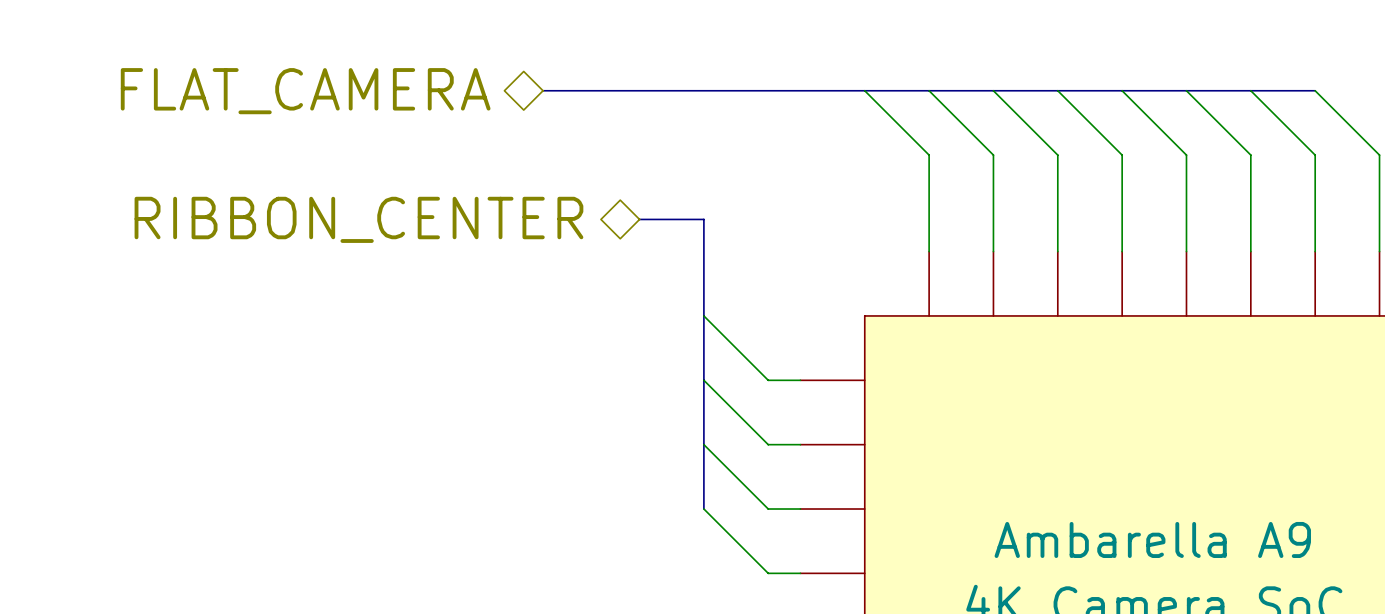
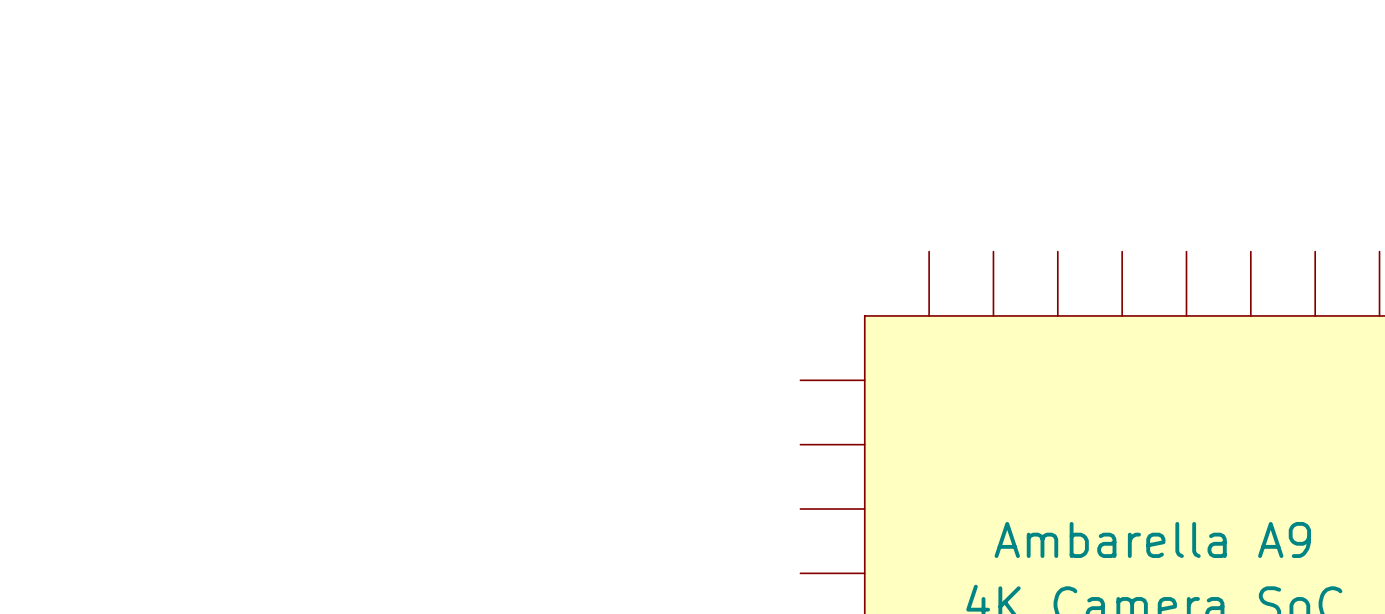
bus: (543, 90) (1315, 90) -> none
wire: (864, 90) (929, 155) (929, 251) -> none
wire: (929, 90) (993, 155) (993, 251) -> none
wire: (993, 90) (1057, 155) (1057, 251) -> none
wire: (1057, 90) (1122, 155) (1122, 251) -> none
wire: (1122, 90) (1186, 155) (1186, 251) -> none
wire: (1186, 90) (1250, 155) (1250, 251) -> none
wire: (1250, 90) (1315, 155) (1315, 251) -> none
wire: (1315, 90) (1379, 155) (1379, 251) -> none
hierarchical label: FLAT_CAMERA (305, 91) -> none
hierarchical label: RIBBON_CENTER (358, 219) -> none
bus: (639, 219) (703, 219) (703, 509) -> none
wire: (703, 315) (768, 380) (800, 380) -> none
wire: (703, 380) (768, 444) (800, 444) -> none
wire: (703, 444) (768, 509) (800, 509) -> none
wire: (703, 509) (768, 573) (800, 573) -> none

